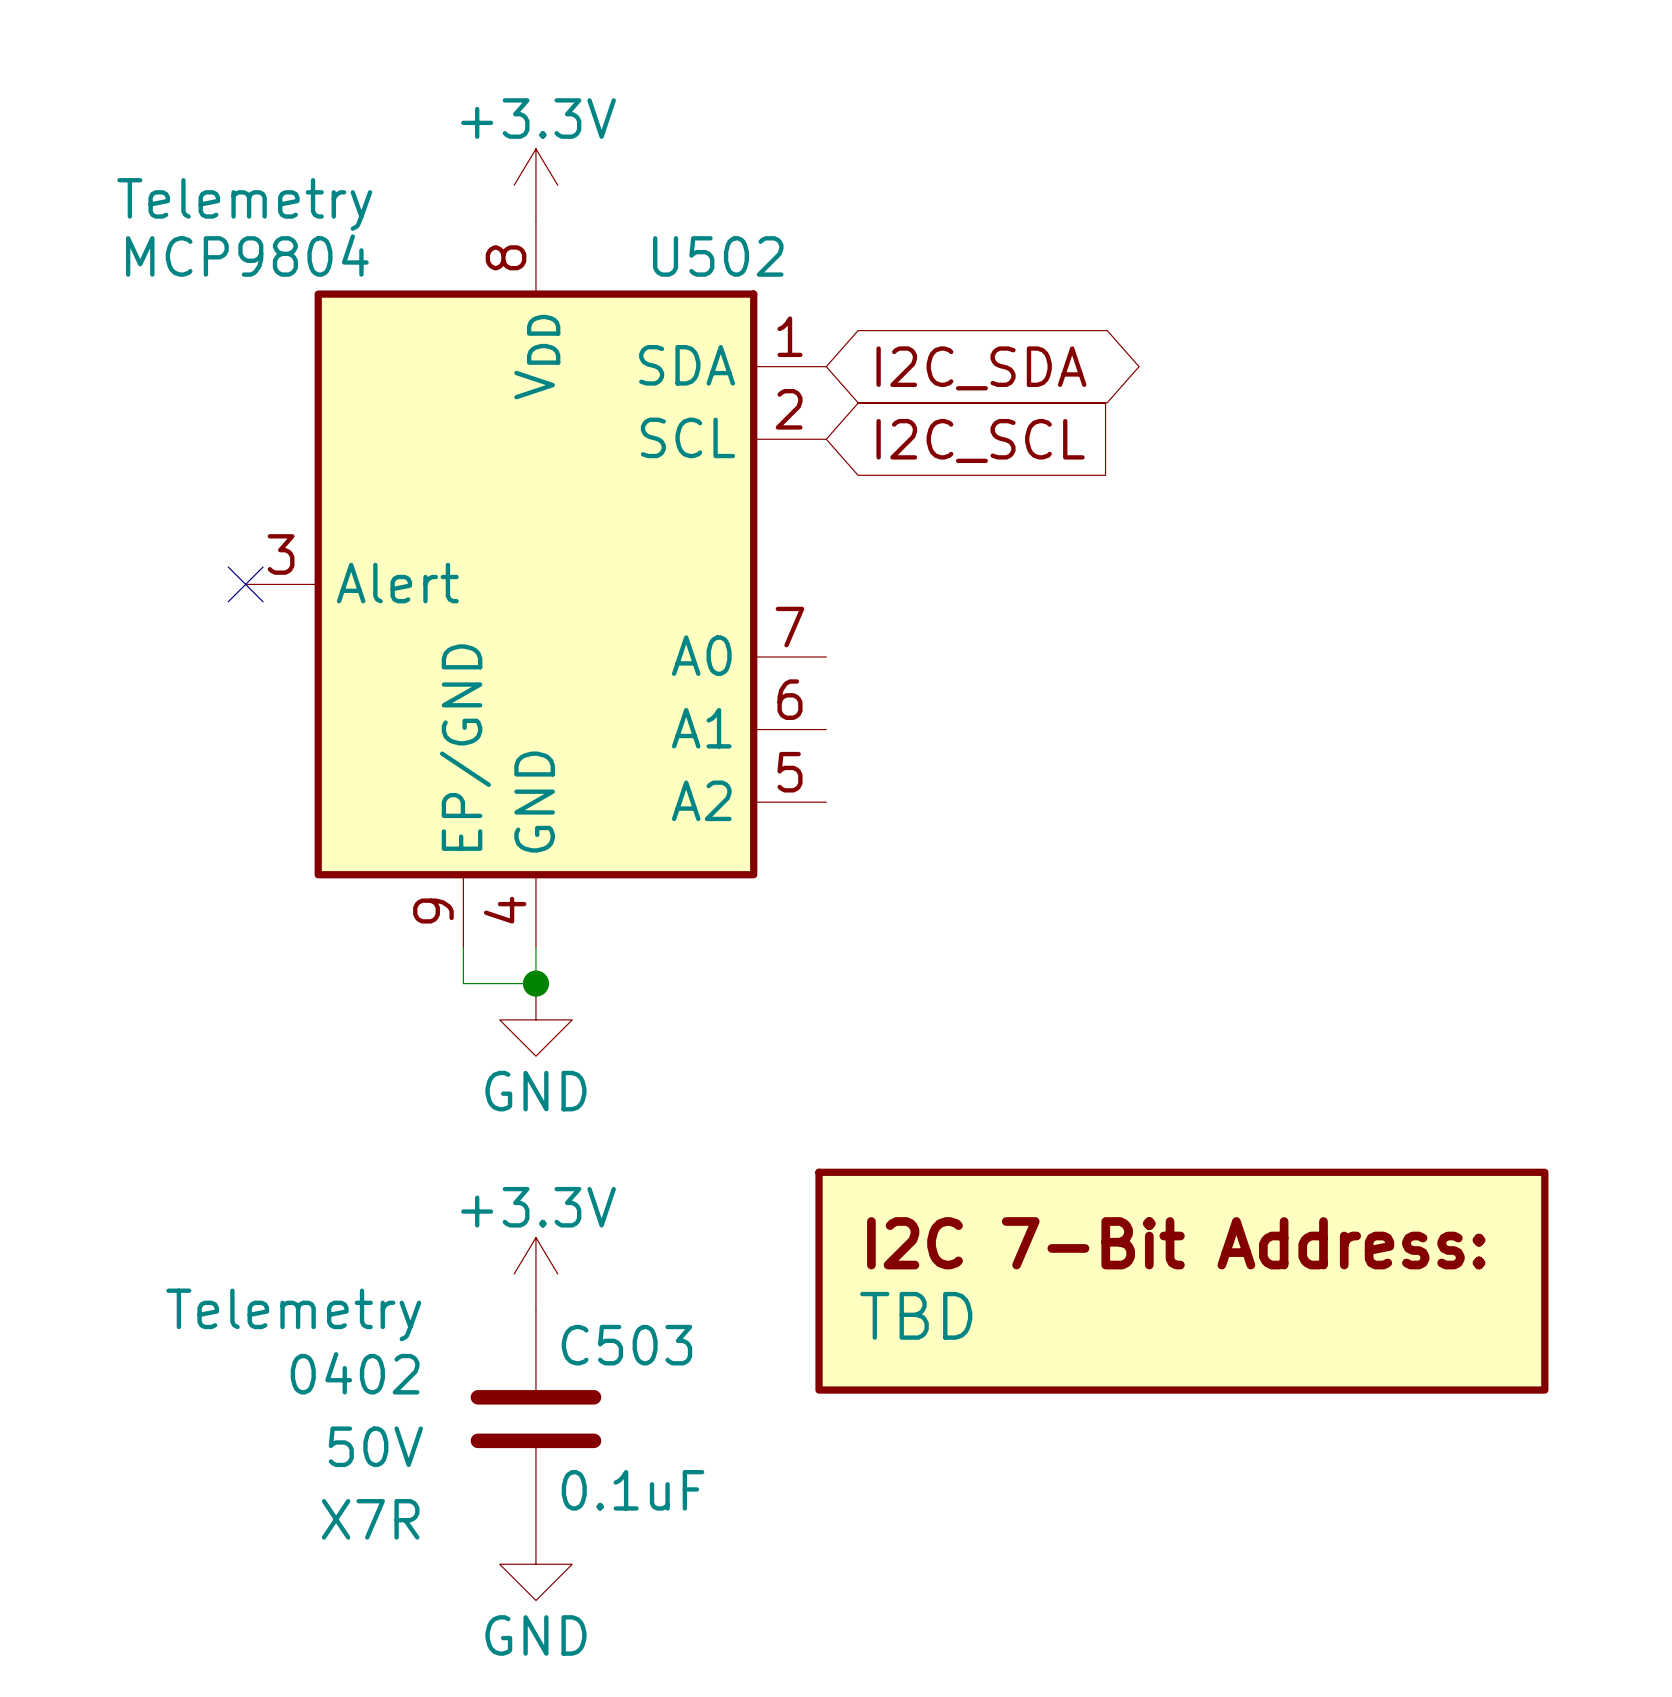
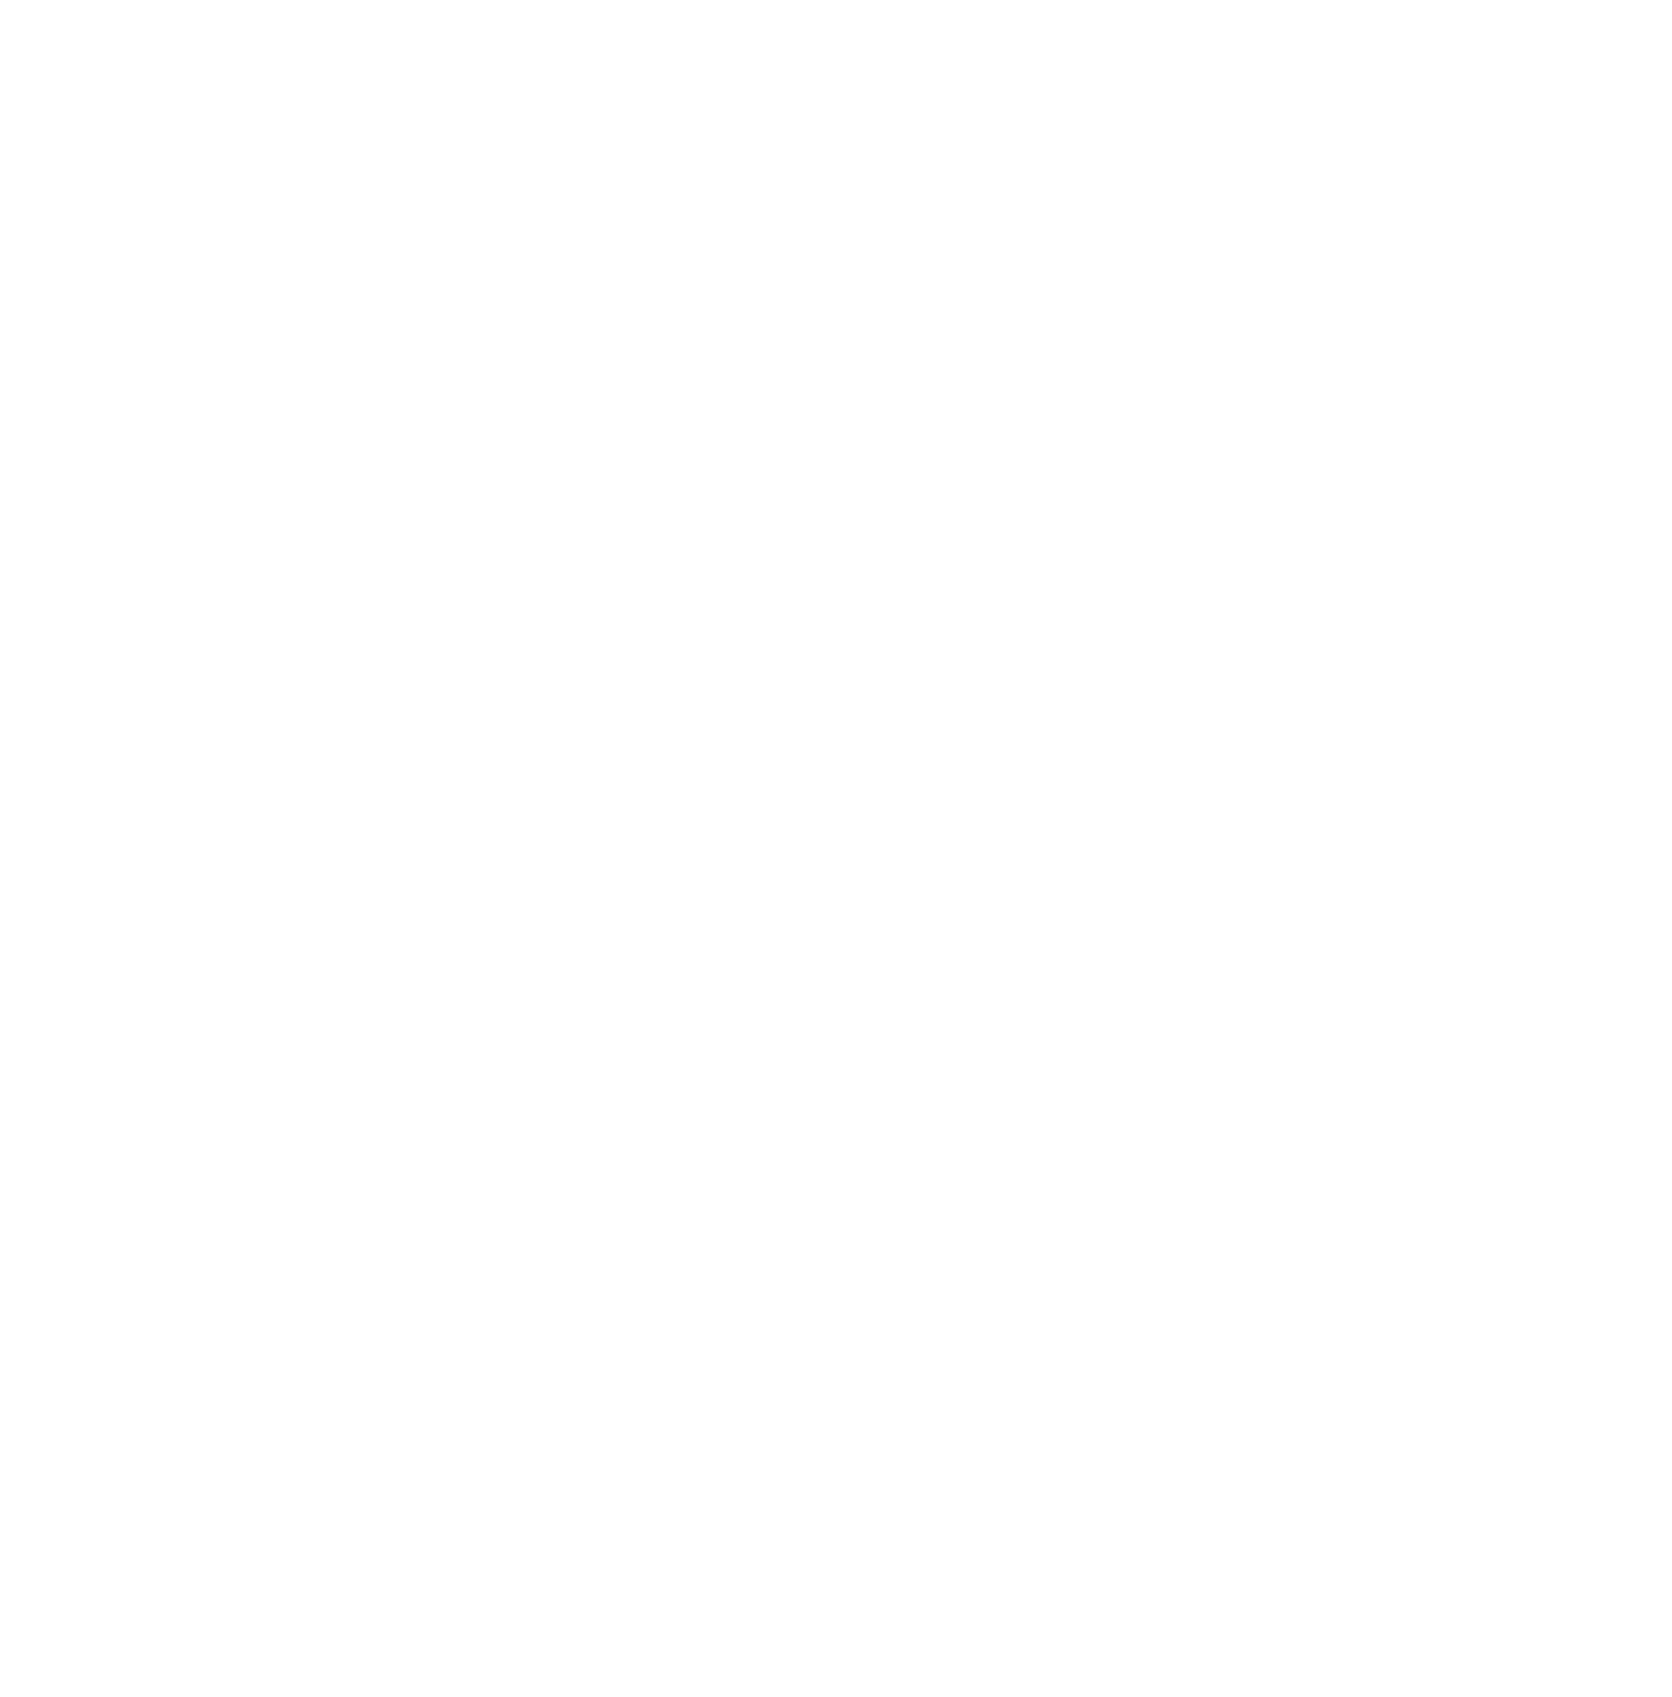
power symbol: +3.3V (535, 185) -> none
global label: I2C_SDA (981, 368) -> none
global label: I2C_SCL (980, 440) -> none
no-connect mark: (245, 584) -> none
U502: MCP9804 (535, 584) -> none
wire: (463, 947) (463, 983) (535, 983) (535, 947) -> none
junction: (535, 983) -> none
power symbol: GND (535, 1019) -> none
power symbol: +3.3V (535, 1273) -> none
part: TBD (1181, 1281) -> none
C503: 0.1uF (535, 1419) -> none
power symbol: GND (535, 1564) -> none

